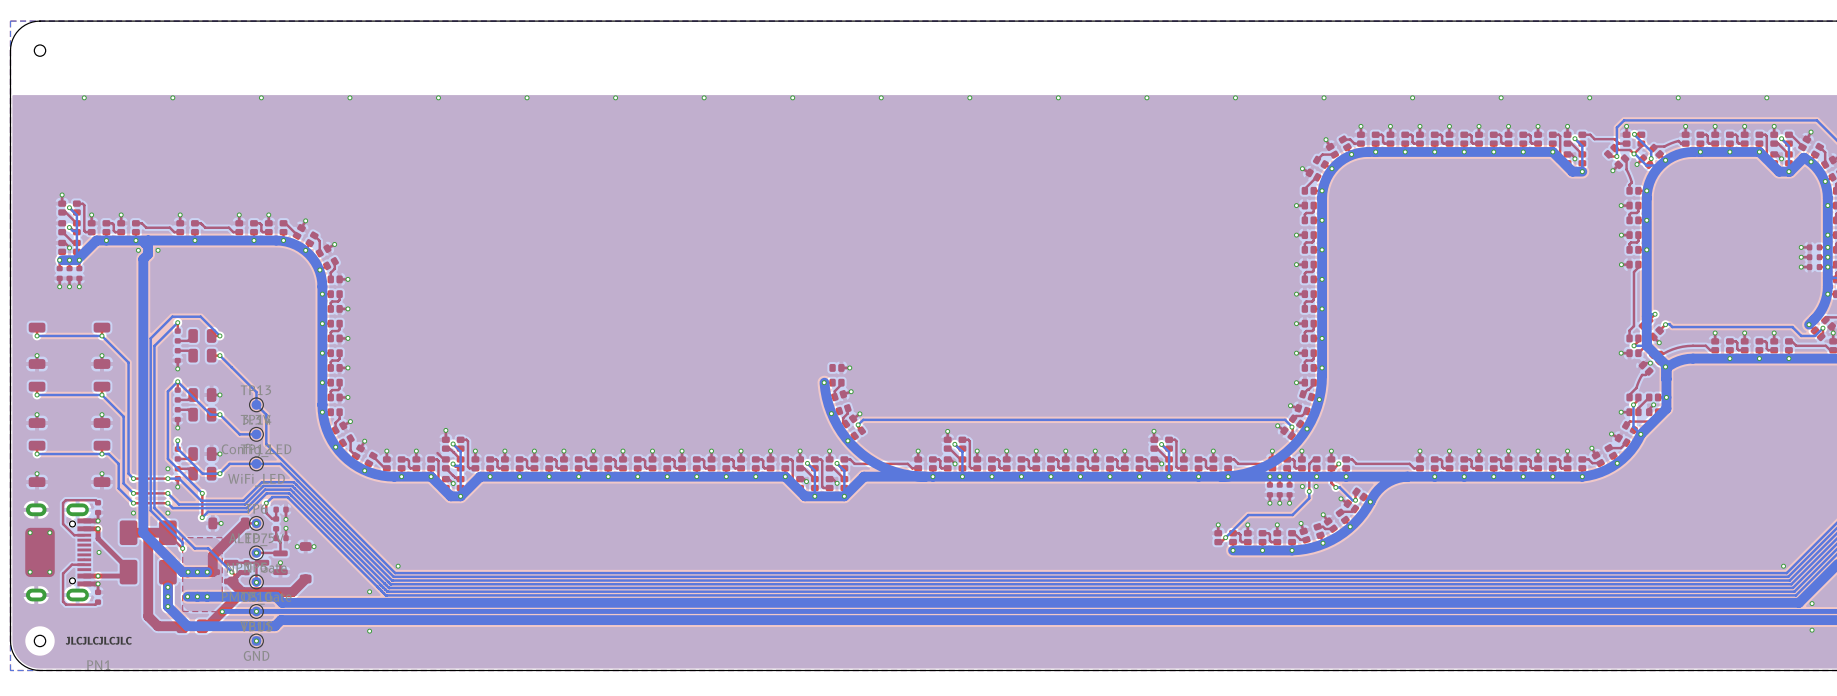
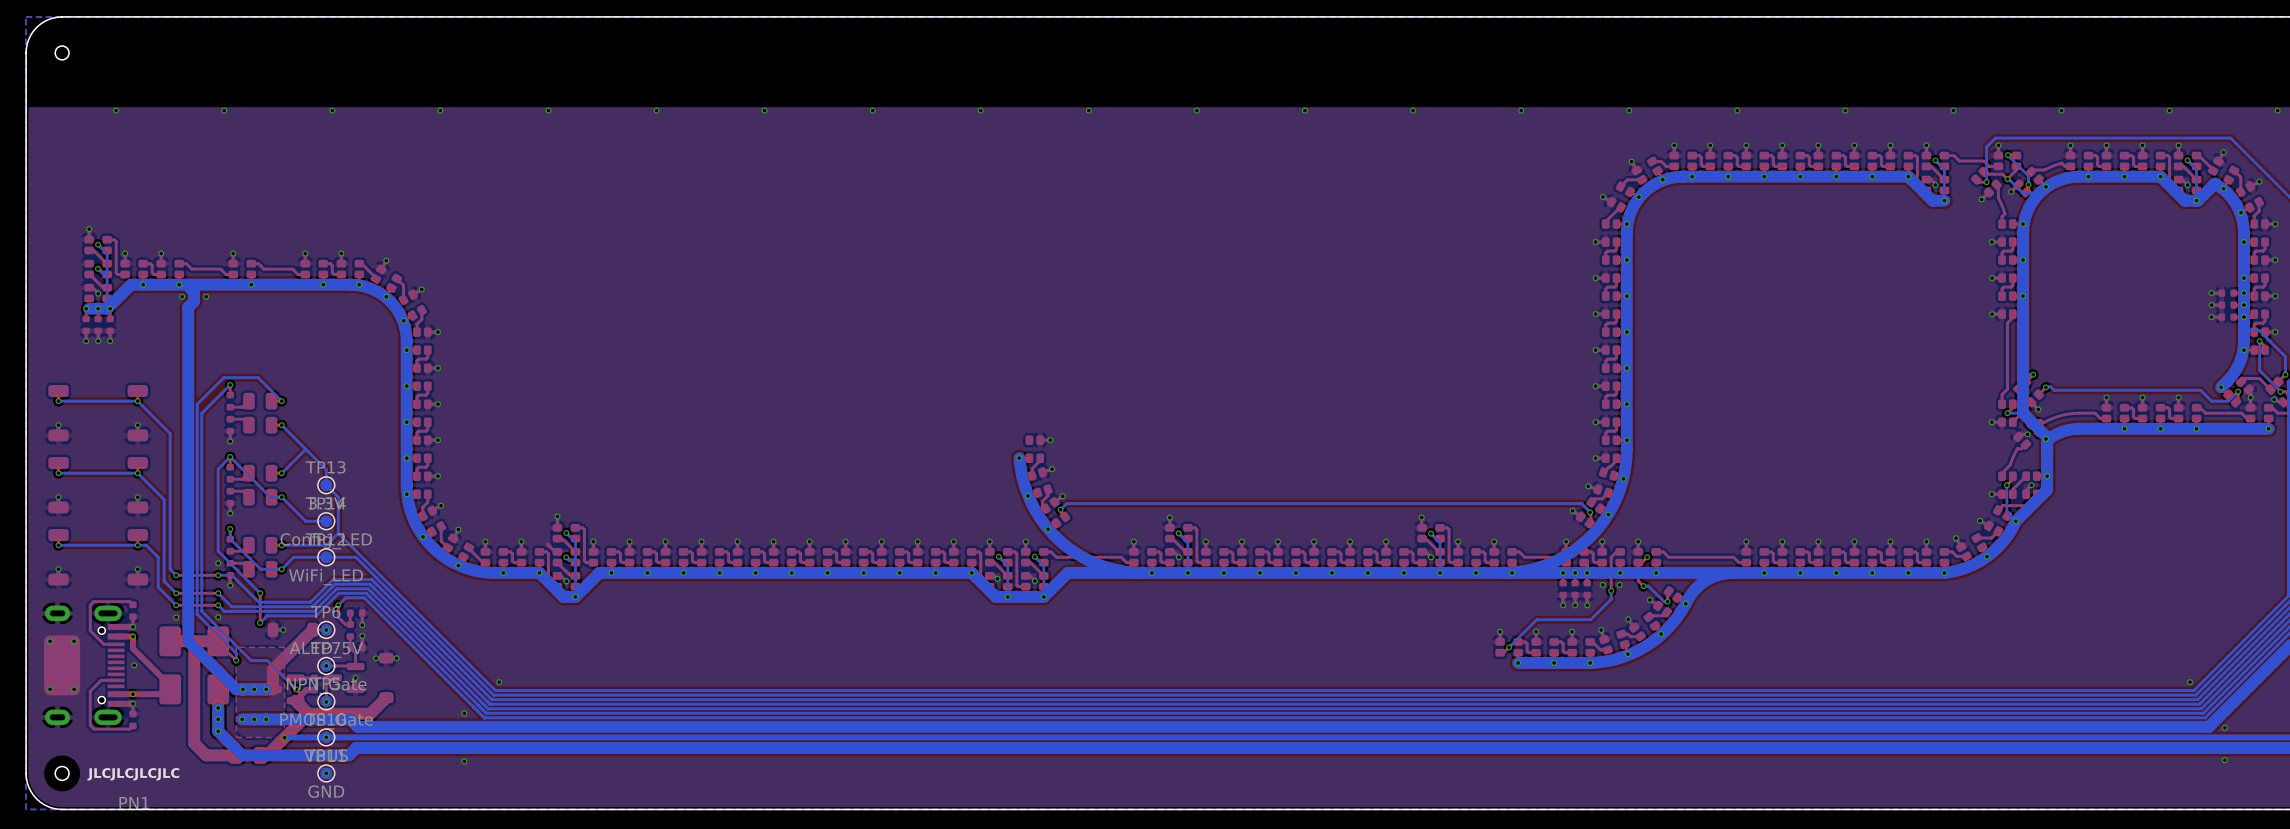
bottom track: none -> (305, 449) (281, 473)
bottom track: none -> (338, 533) (326, 545) (281, 545)

